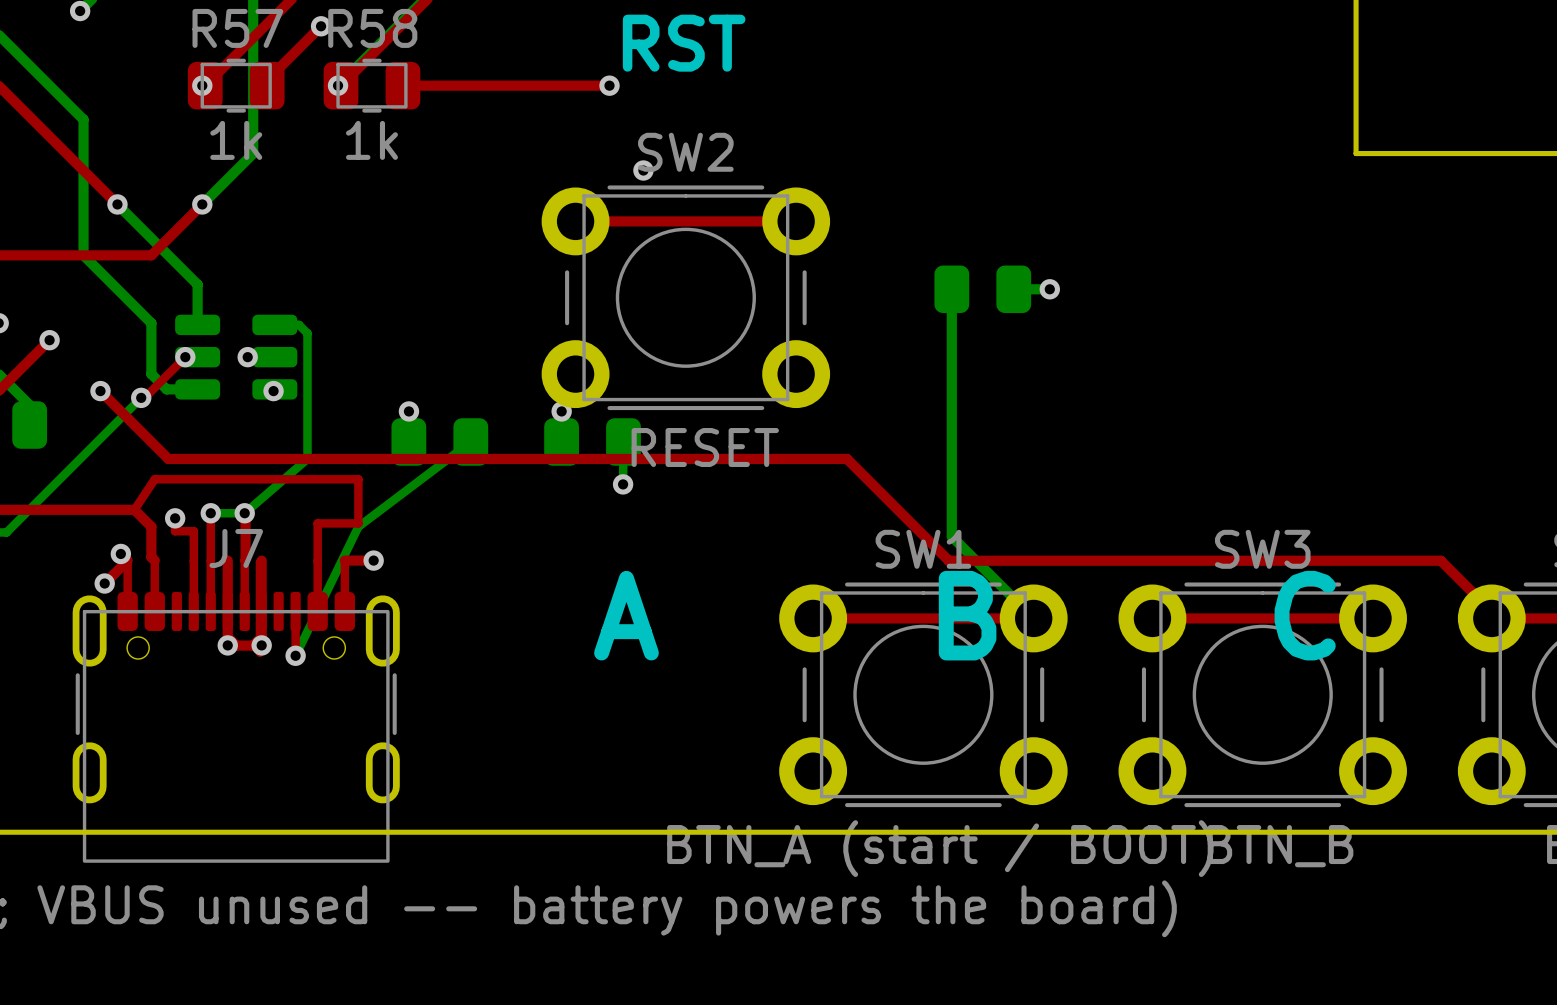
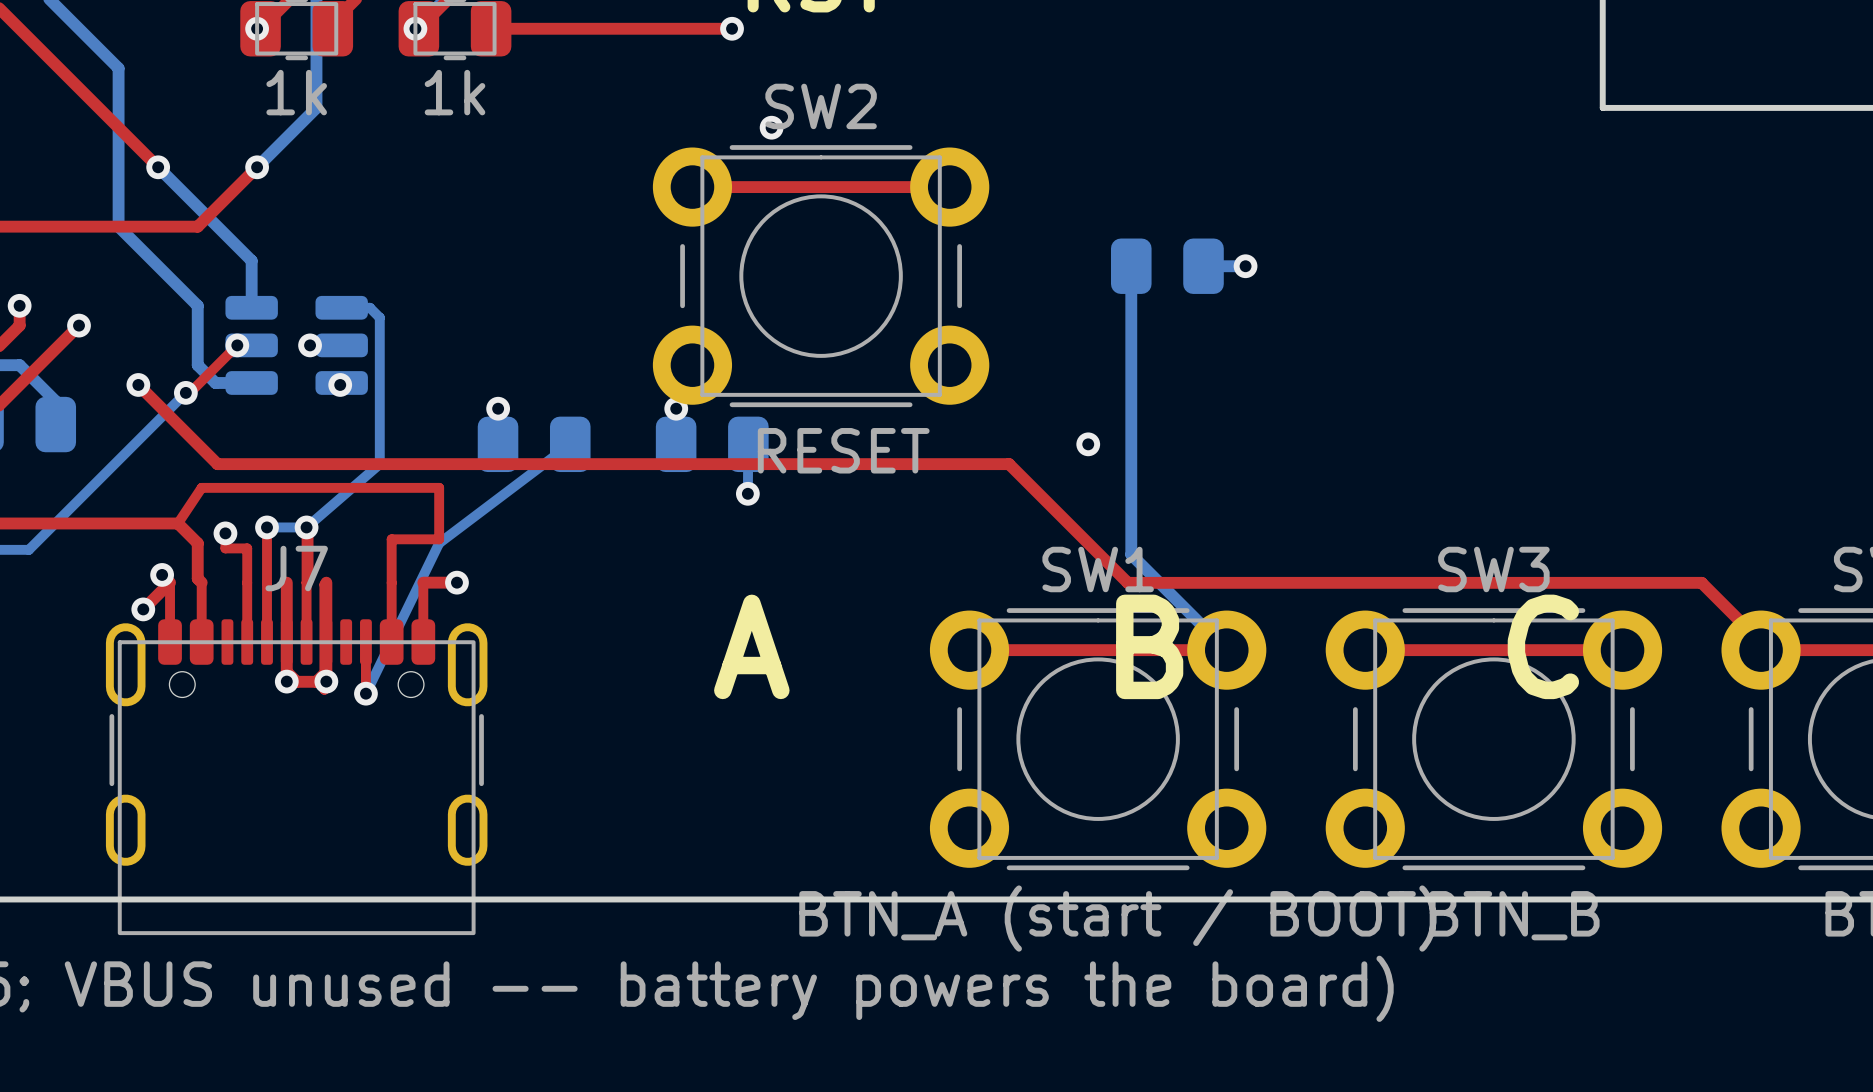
via: none -> (1088, 444)

